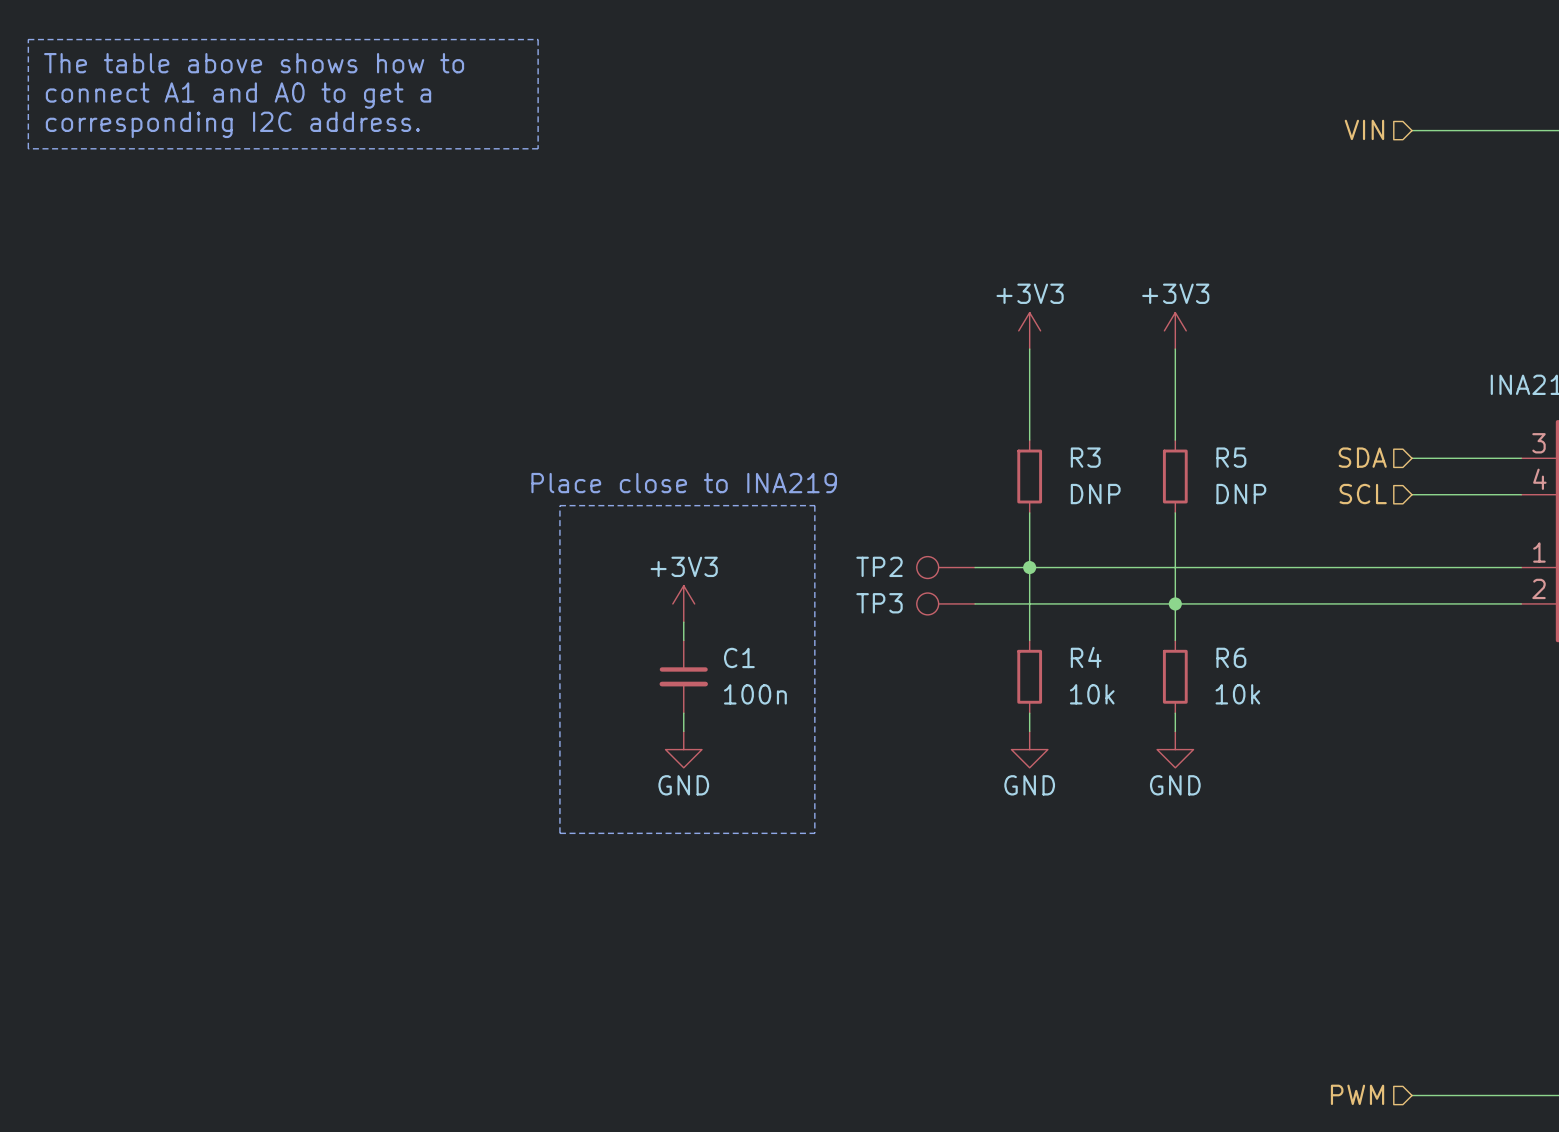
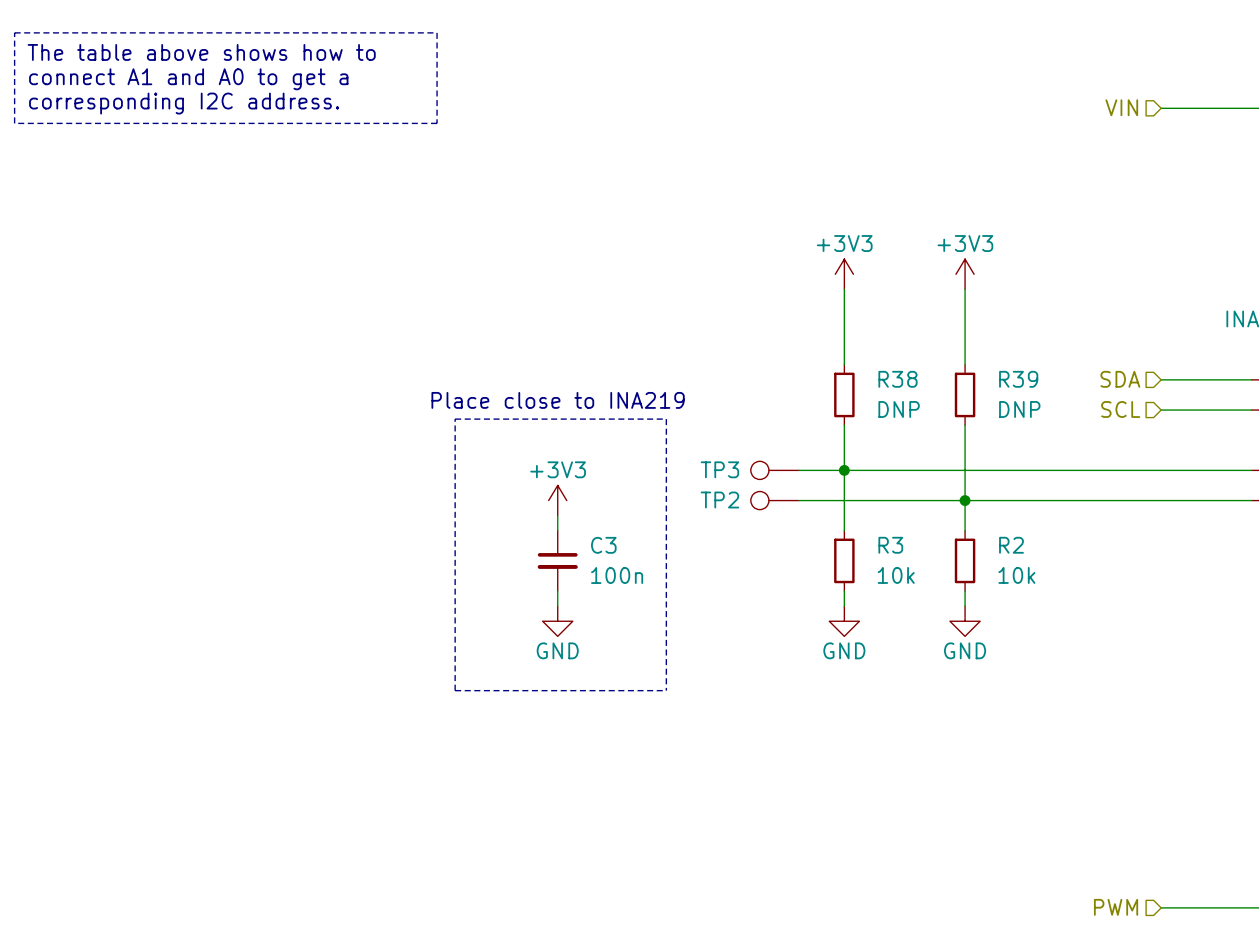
R3 name: R3 (1085, 457) -> R38 (898, 379)
R5 name: R5 (1231, 457) -> R39 (1018, 379)
TP2 name: TP2 (879, 566) -> TP3 (719, 469)
TP3 name: TP3 (879, 603) -> TP2 (719, 500)
C1 name: C1 (739, 657) -> C3 (603, 545)
R4 name: R4 (1086, 657) -> R3 (890, 545)
R6 name: R6 (1231, 657) -> R2 (1011, 545)

